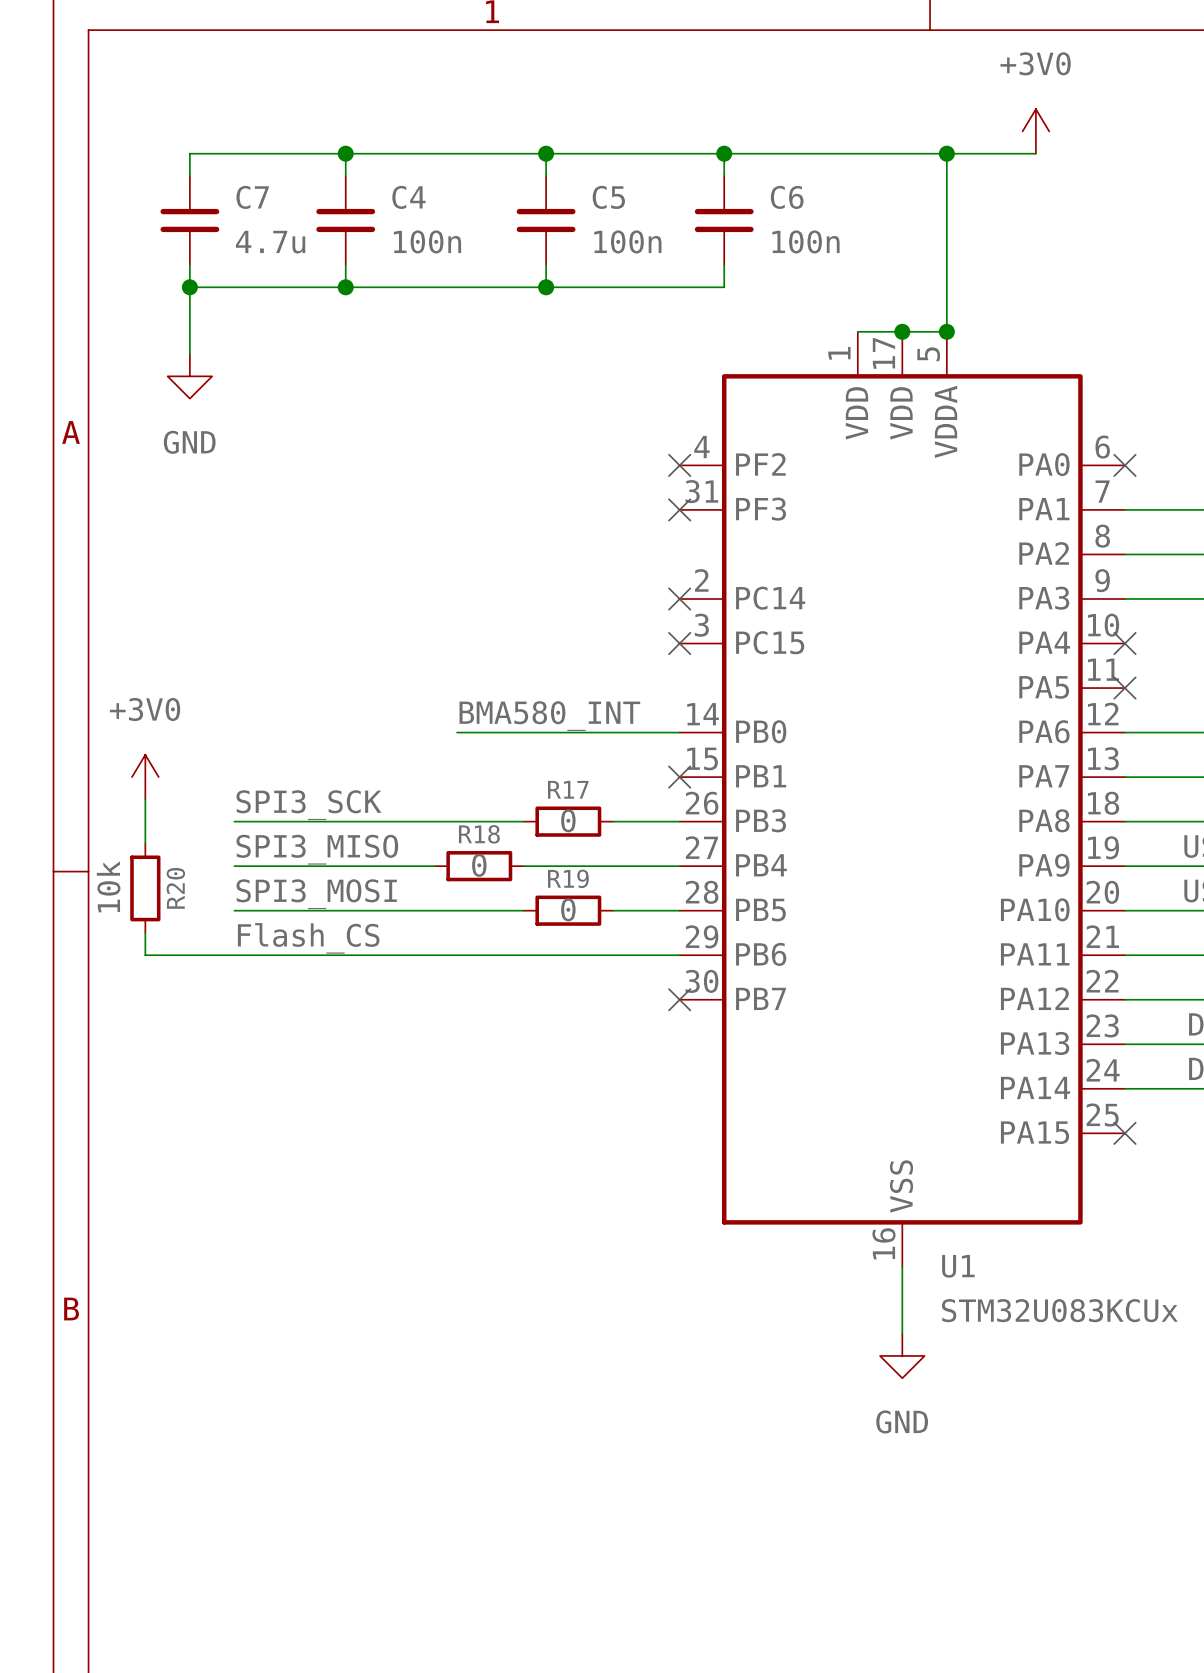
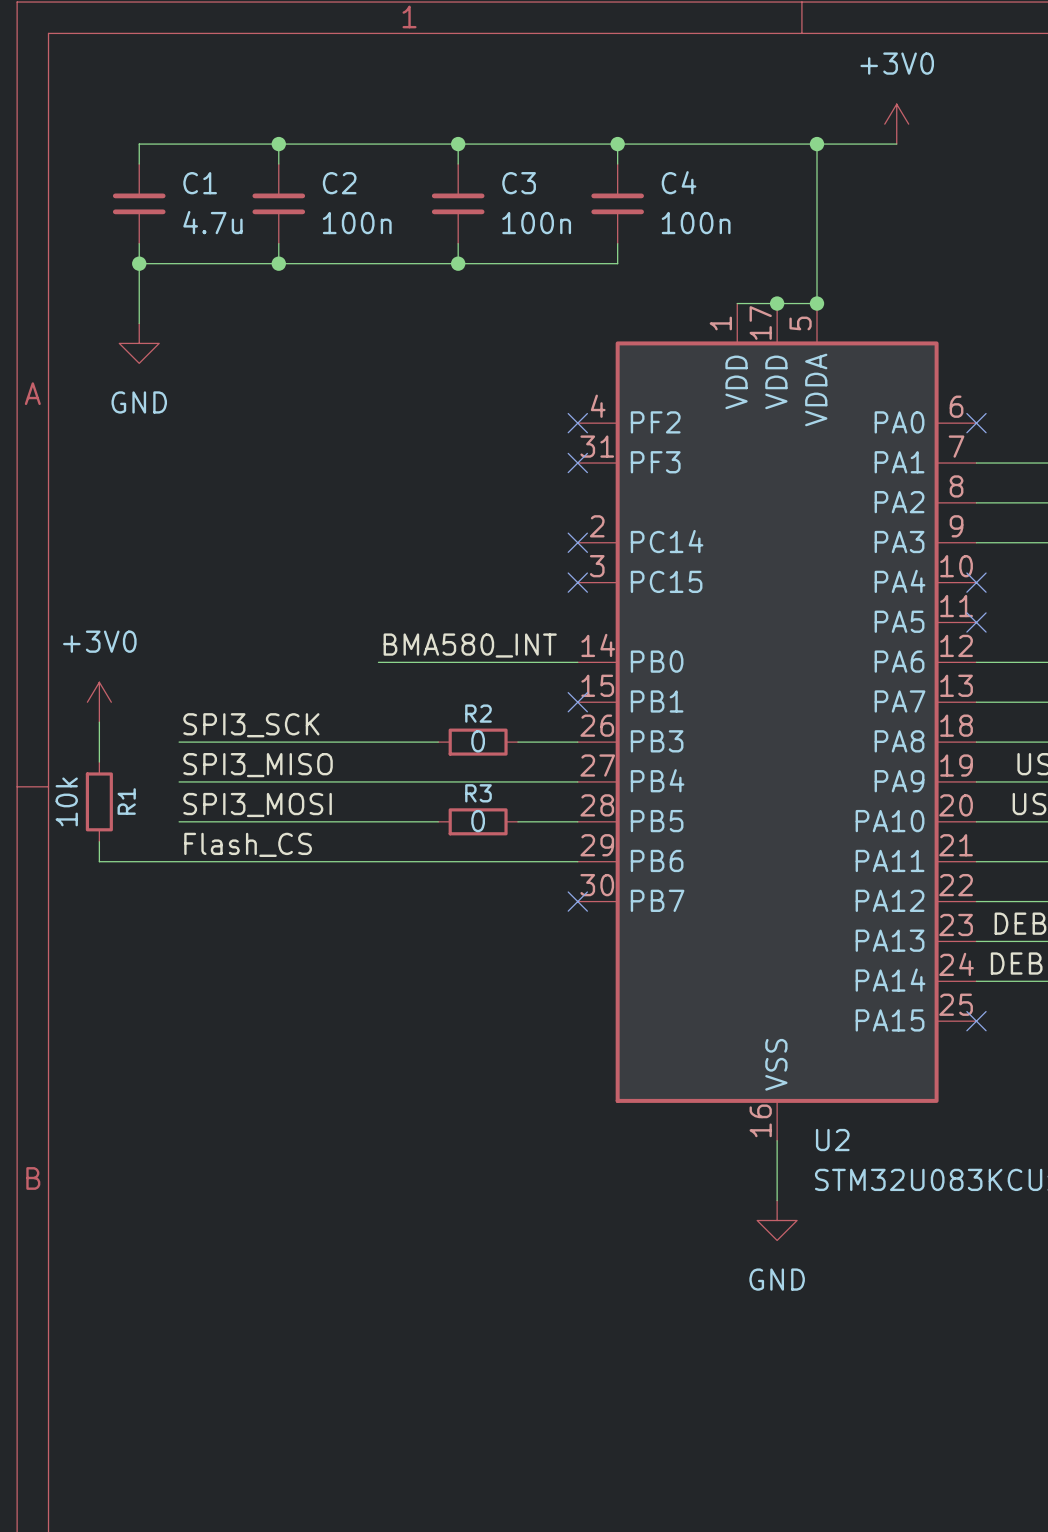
C7 name: C7 (252, 197) -> C1 (200, 183)
C4 name: C4 (408, 197) -> C2 (339, 183)
C5 name: C5 (608, 197) -> C3 (519, 183)
C6 name: C6 (787, 197) -> C4 (679, 182)
R17 name: R17 (568, 789) -> R2 (478, 713)
wire: none -> (358, 781) (438, 781)
R18: 0 (479, 866) -> none
R19 name: R19 (568, 878) -> R3 (478, 793)
R20 name: R20 (175, 888) -> R1 (126, 801)
U1 name: U1 (958, 1266) -> U2 (832, 1140)

